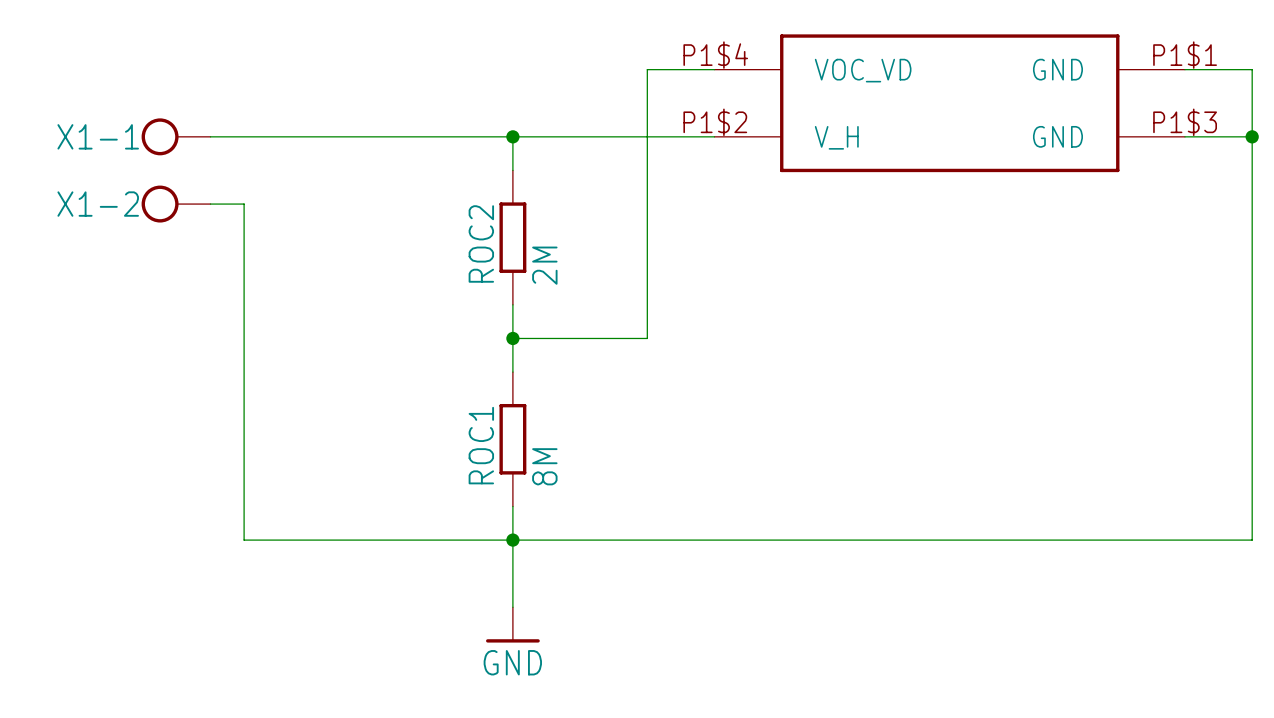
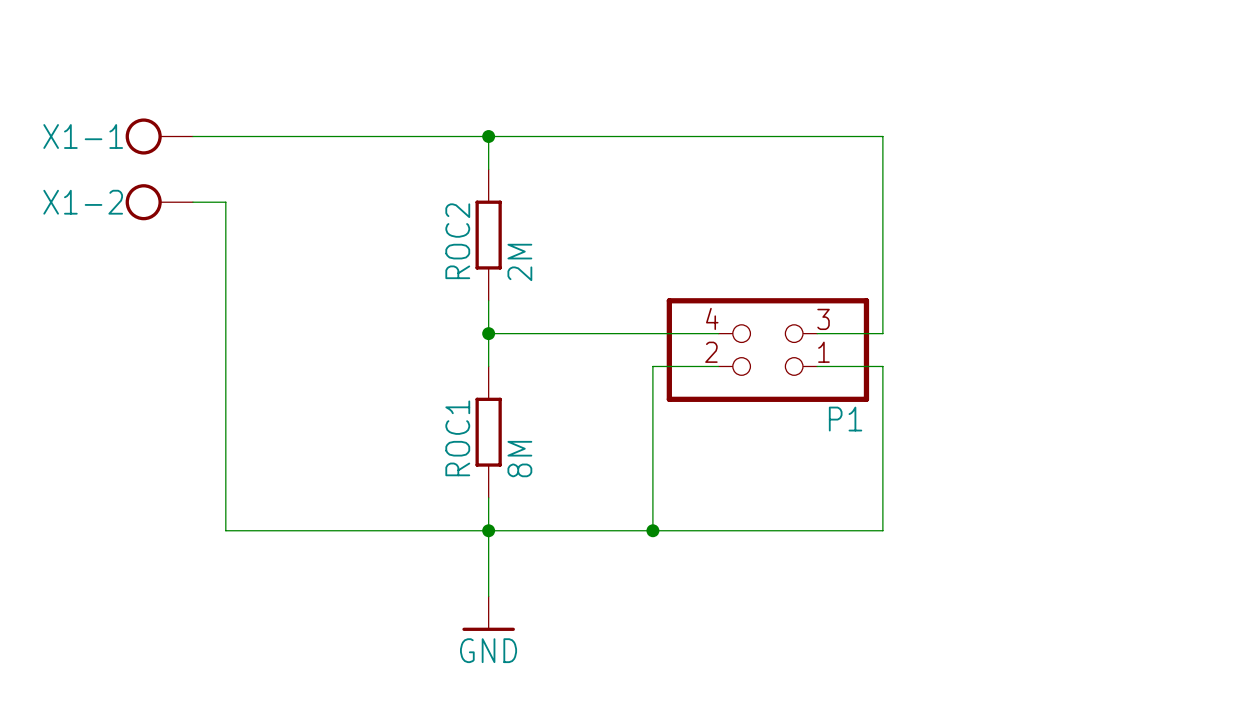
wire: (714, 69) (647, 69) (647, 338) -> (718, 333) (620, 333)
wire: (1184, 69) (1252, 69) (1252, 540) (916, 540) -> (817, 366) (882, 366) (882, 530)
part: (949, 103) -> none
wire: none -> (685, 136) (882, 136) (882, 333) (817, 333)
wire: (1184, 136) (1252, 136) -> none
junction: (1252, 136) -> none
P1: none -> (767, 350)
wire: none -> (718, 366) (652, 366) (652, 530)
junction: none -> (652, 530)

